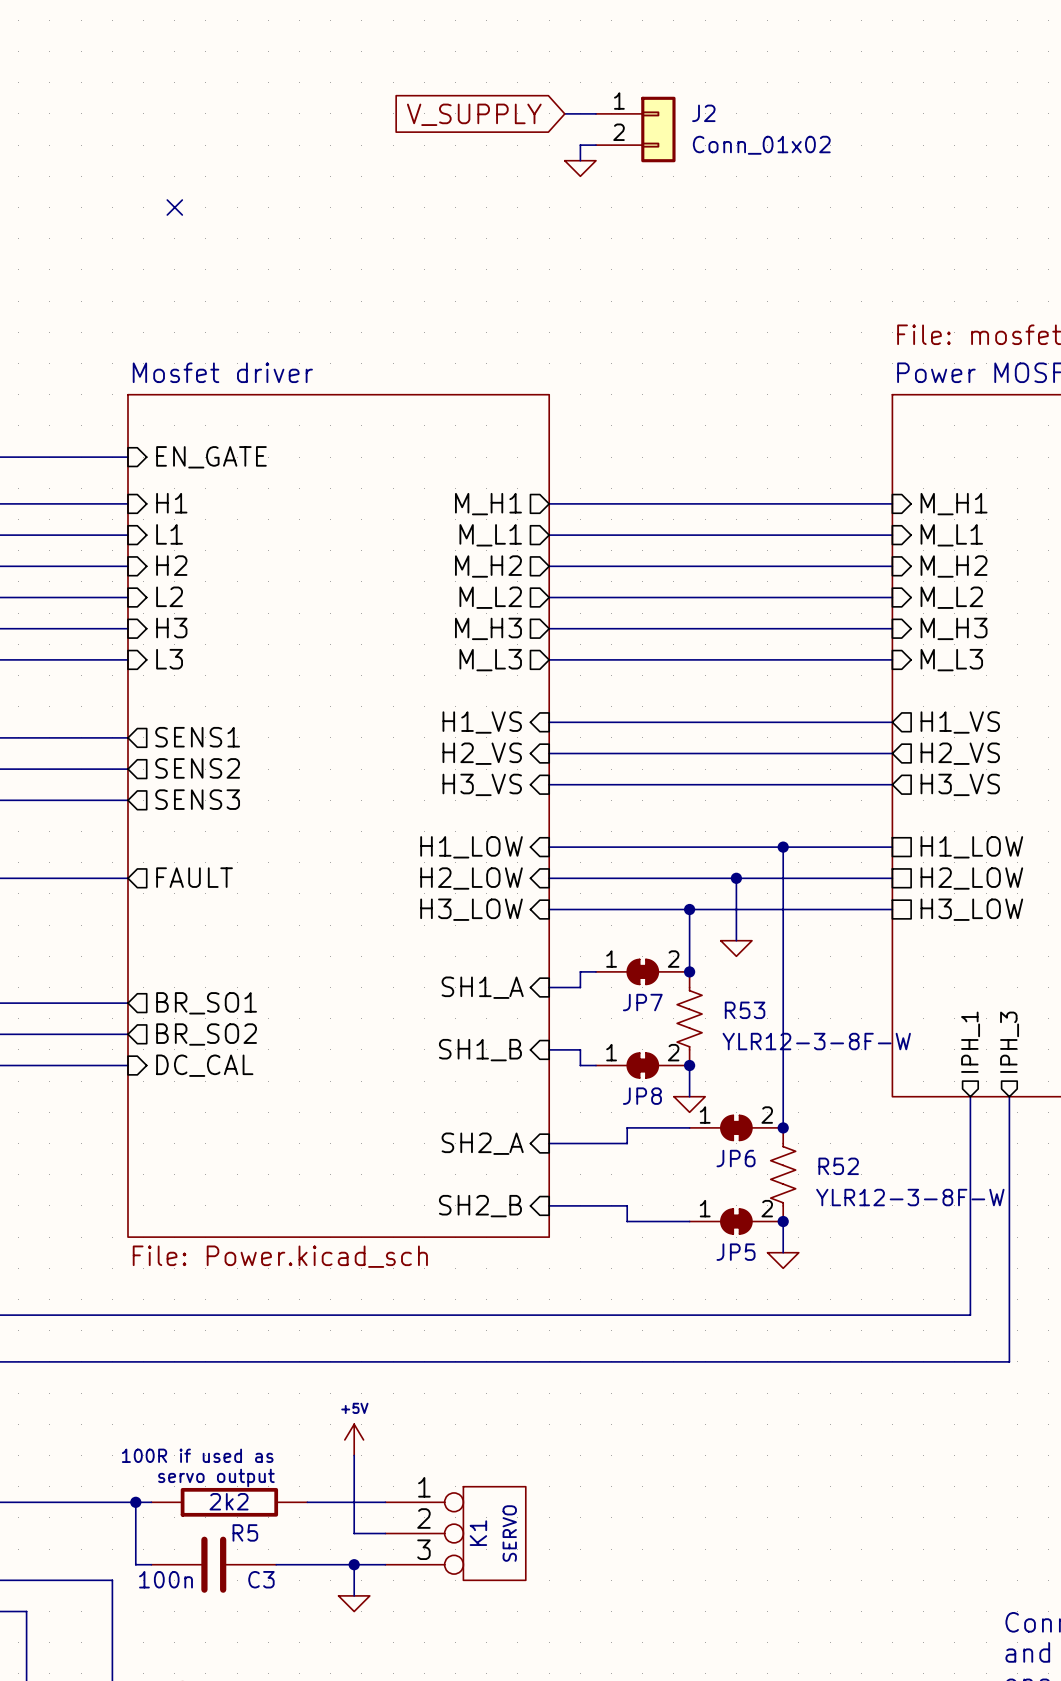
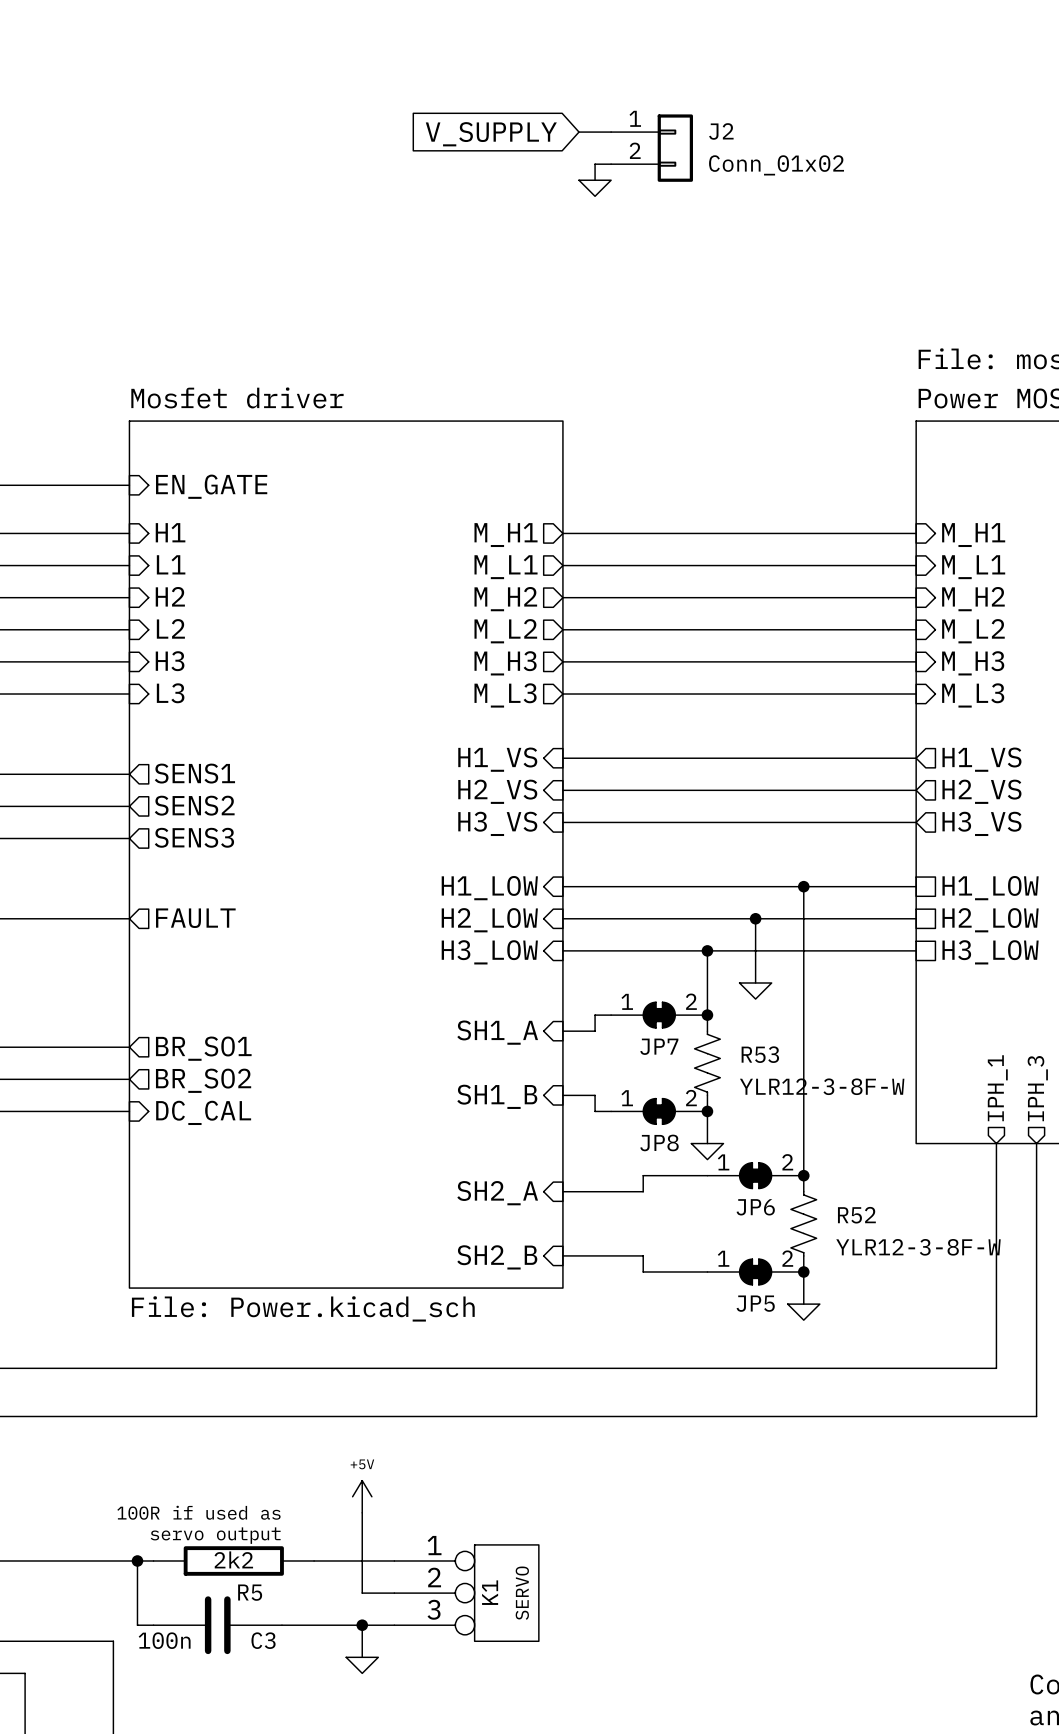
no-connect mark: (174, 207) -> none

